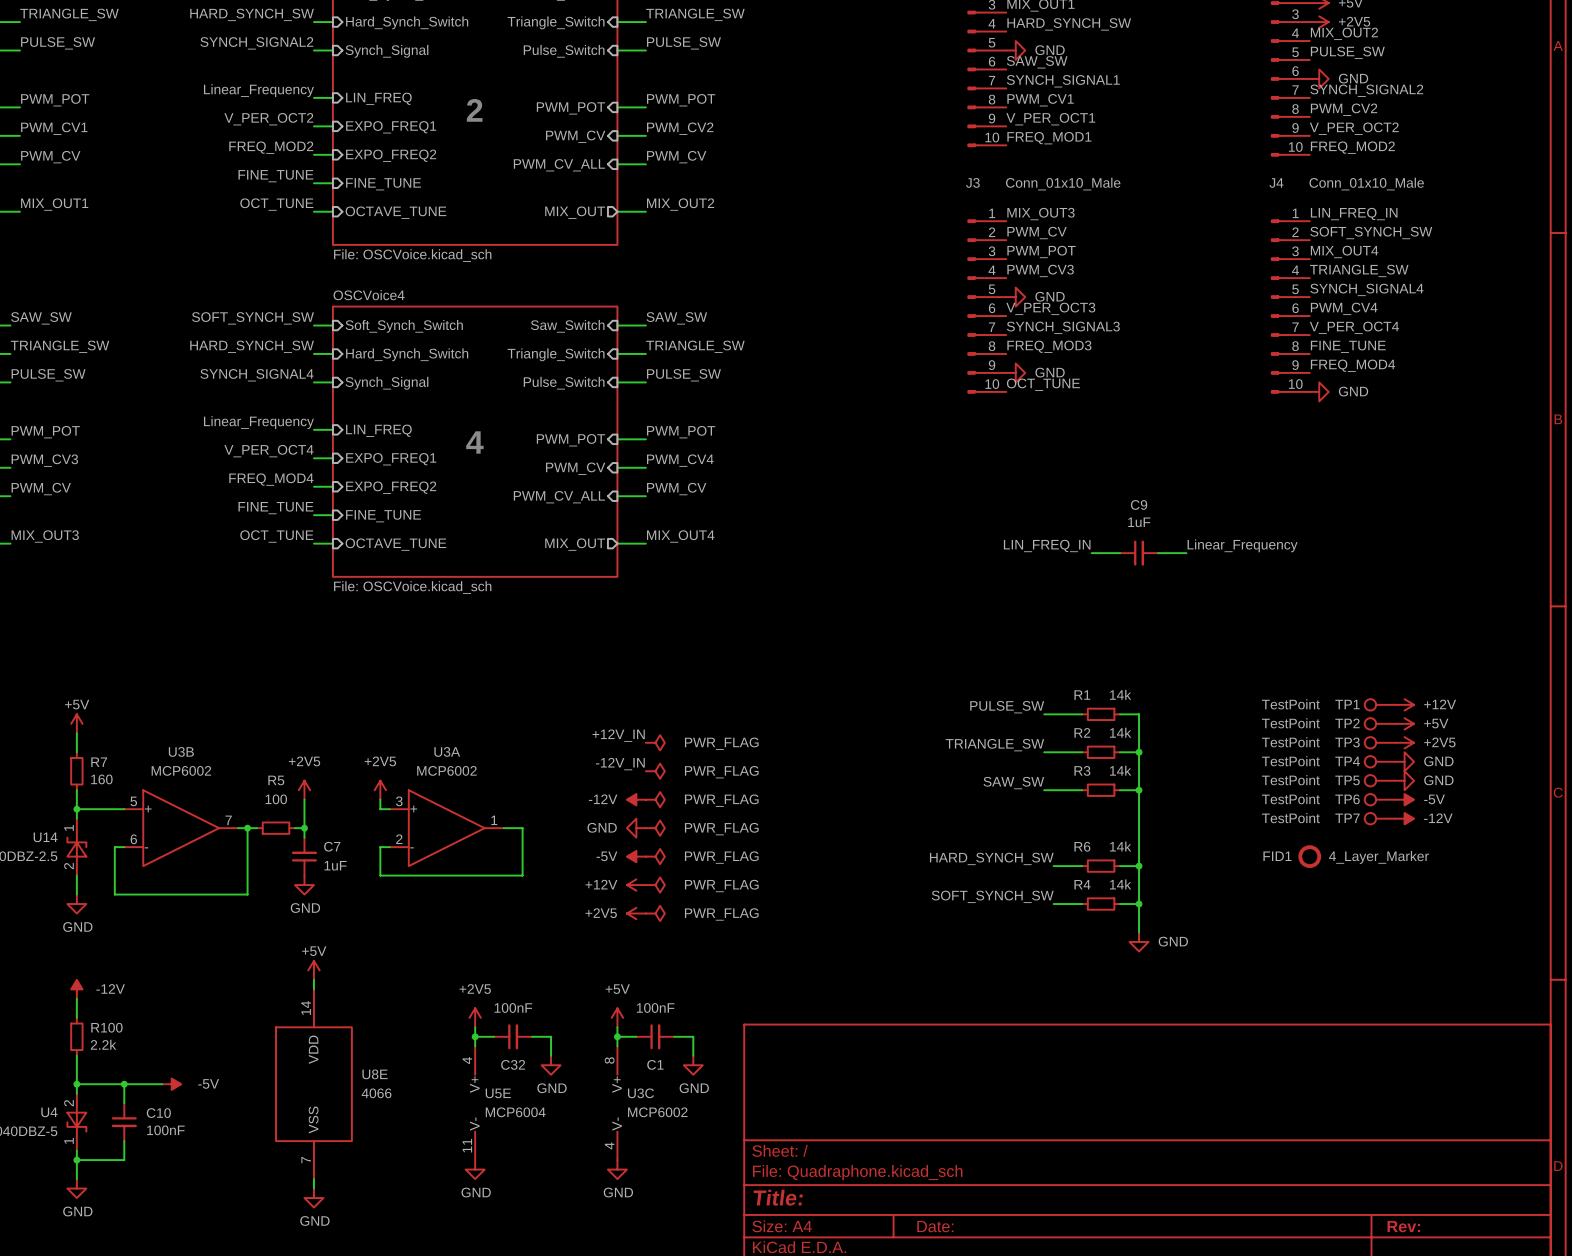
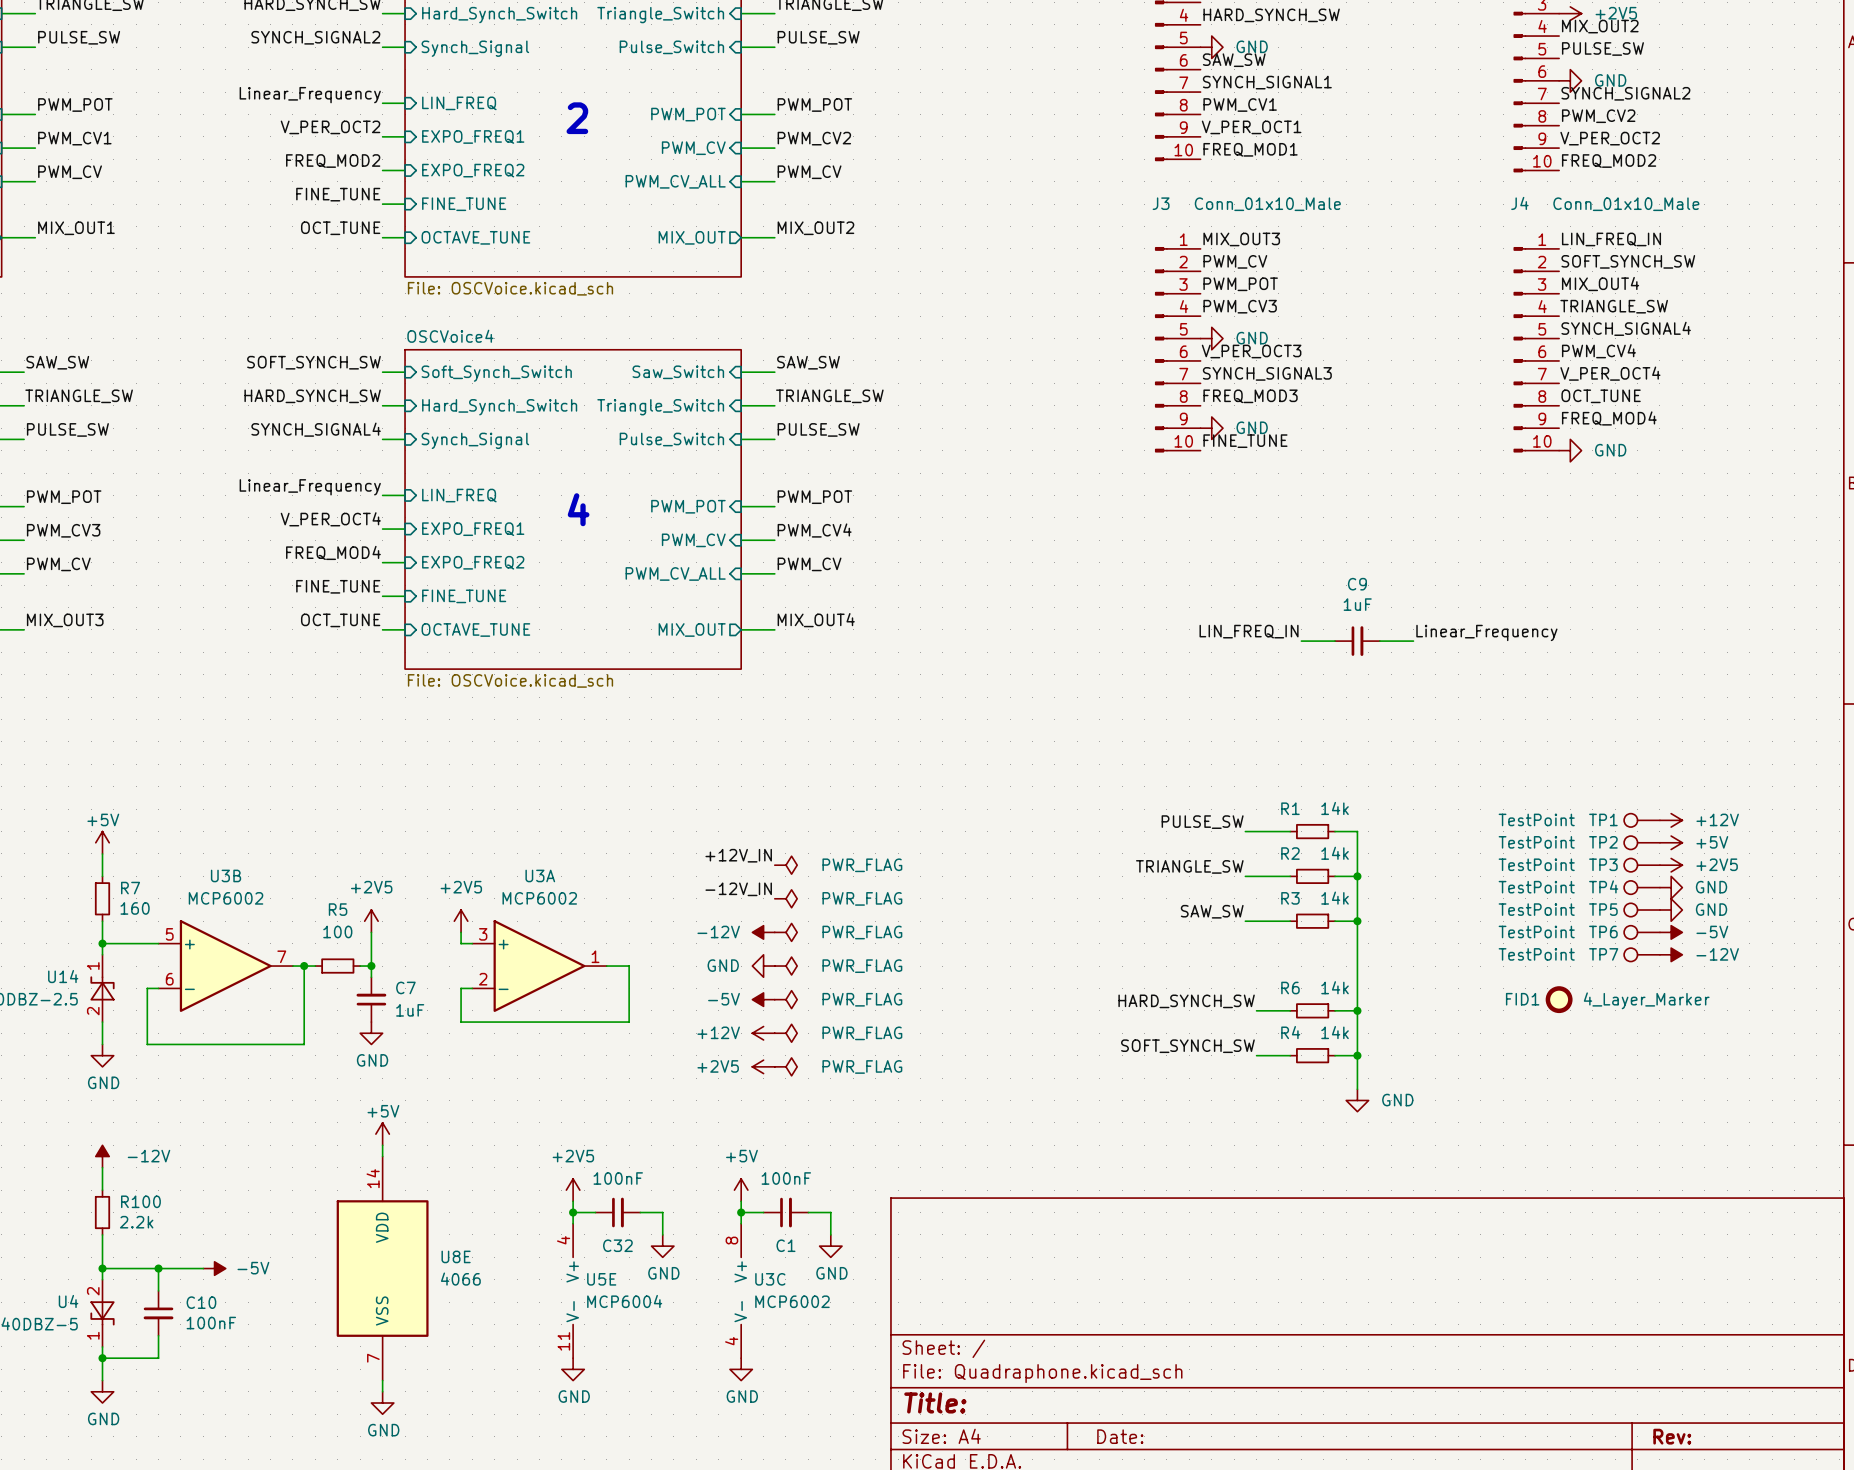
label: FINE_TUNE (1348, 346) -> OCT_TUNE (1601, 396)
label: OCT_TUNE (1043, 384) -> FINE_TUNE (1245, 441)

